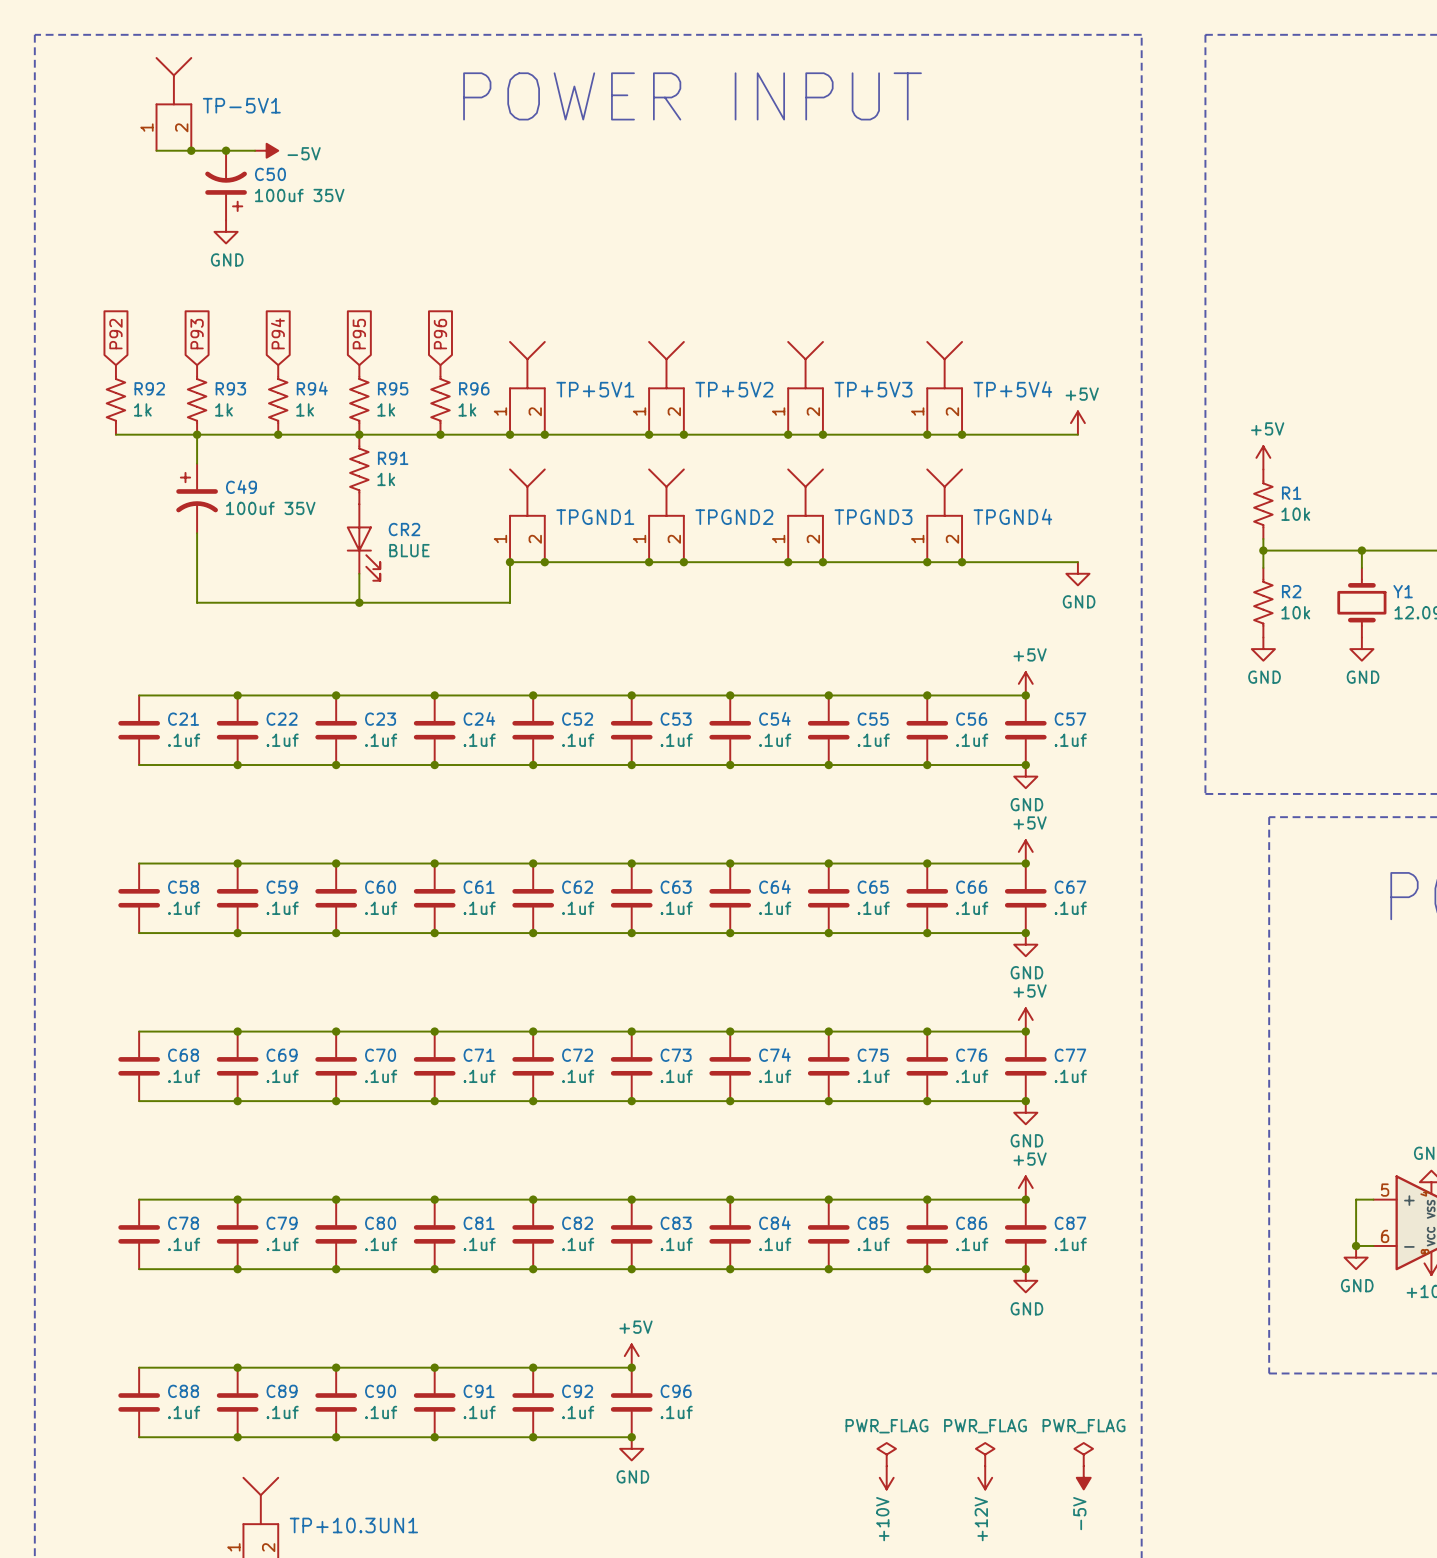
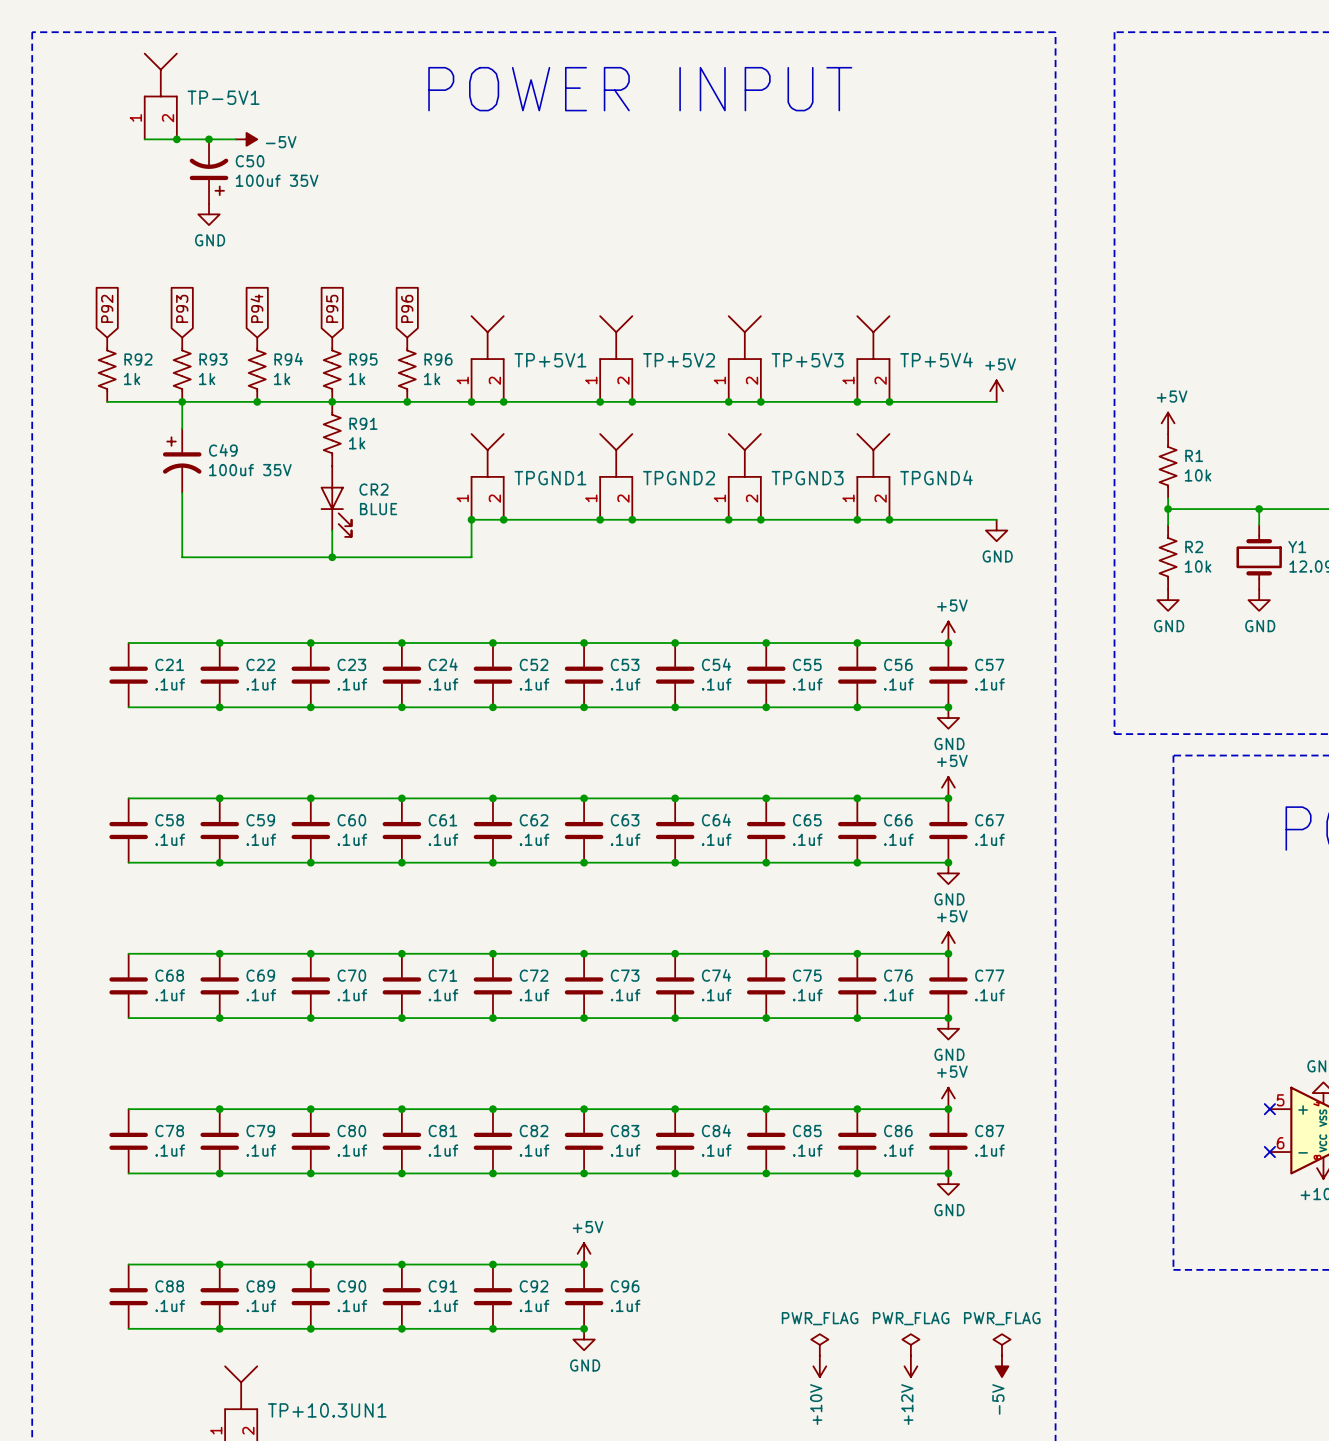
wire: (1373, 1199) (1356, 1199) (1356, 1245) (1373, 1245) -> none
no-connect mark: none -> (1269, 1109)
junction: (1356, 1245) -> none
no-connect mark: none -> (1269, 1152)
power symbol: GND (1356, 1257) -> none

